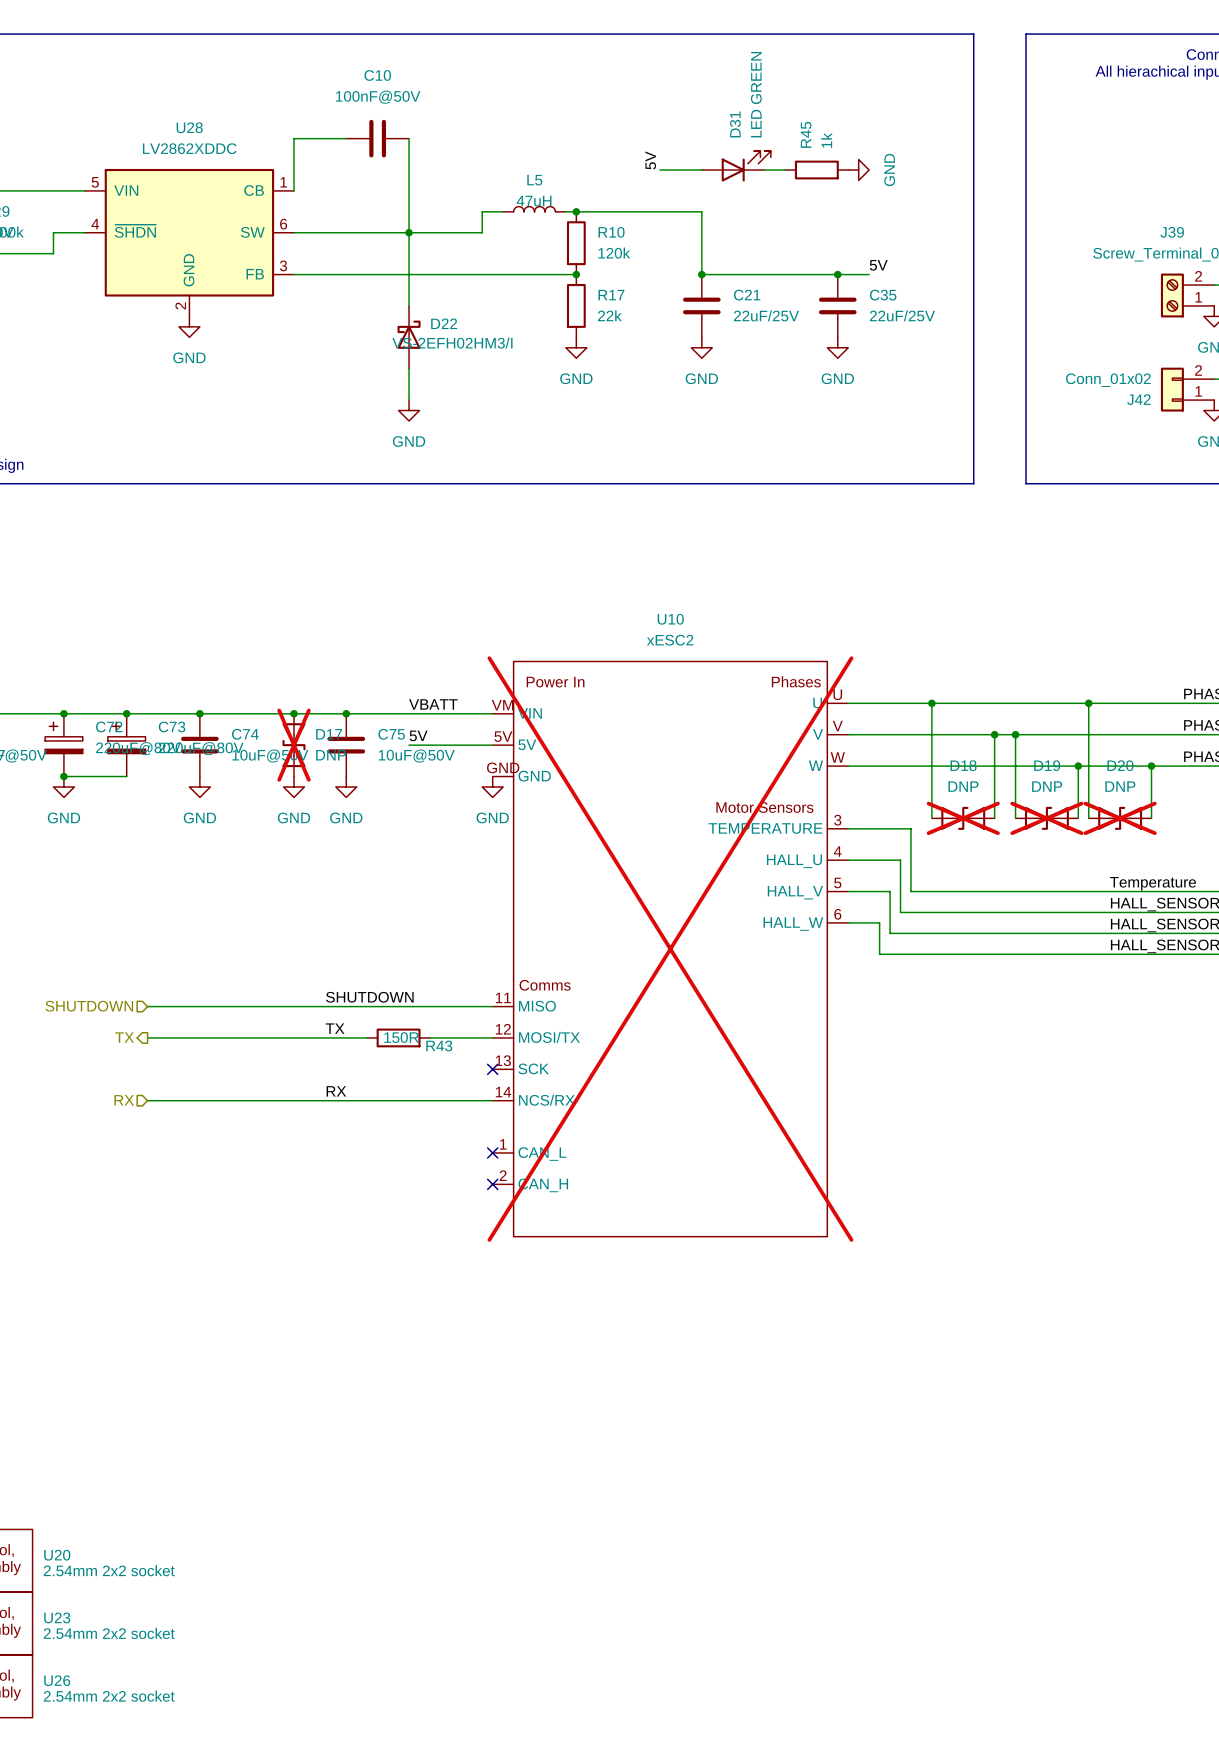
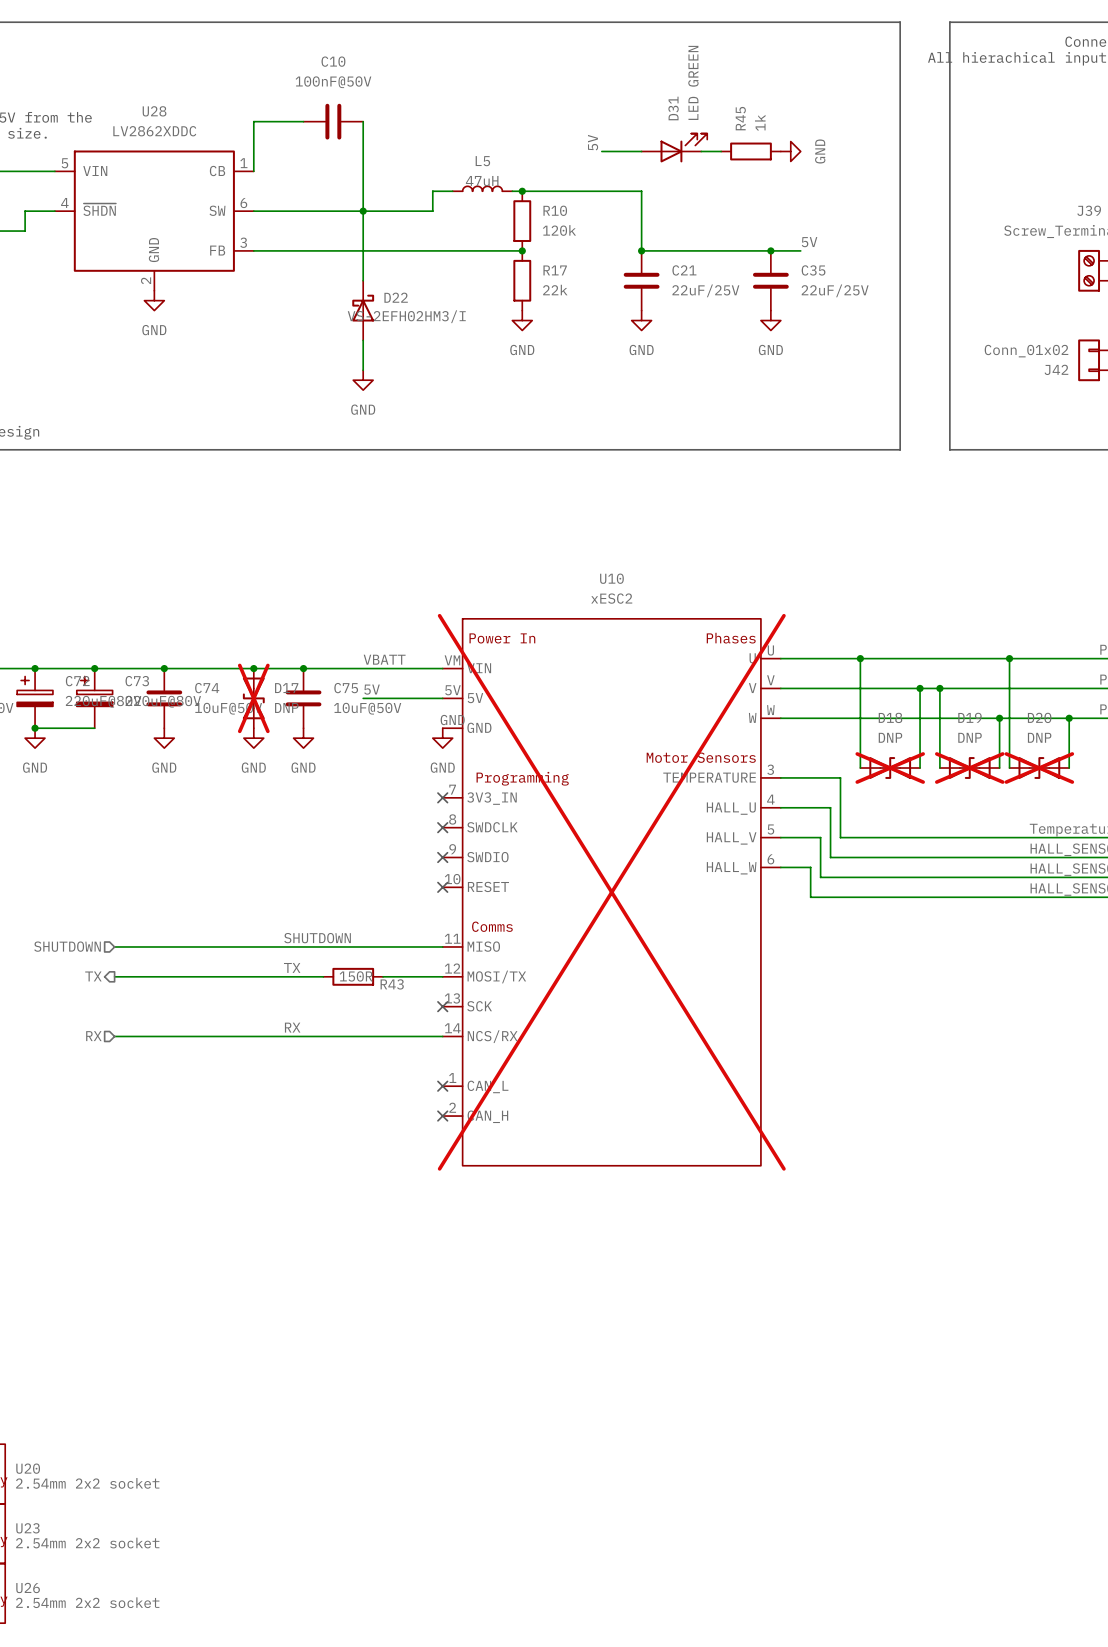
U10 symbol: [492, 661, 849, 1237] -> [442, 618, 781, 1166]
no-connect mark: none -> (442, 797)
no-connect mark: none -> (442, 827)
no-connect mark: none -> (442, 857)
no-connect mark: none -> (442, 887)

